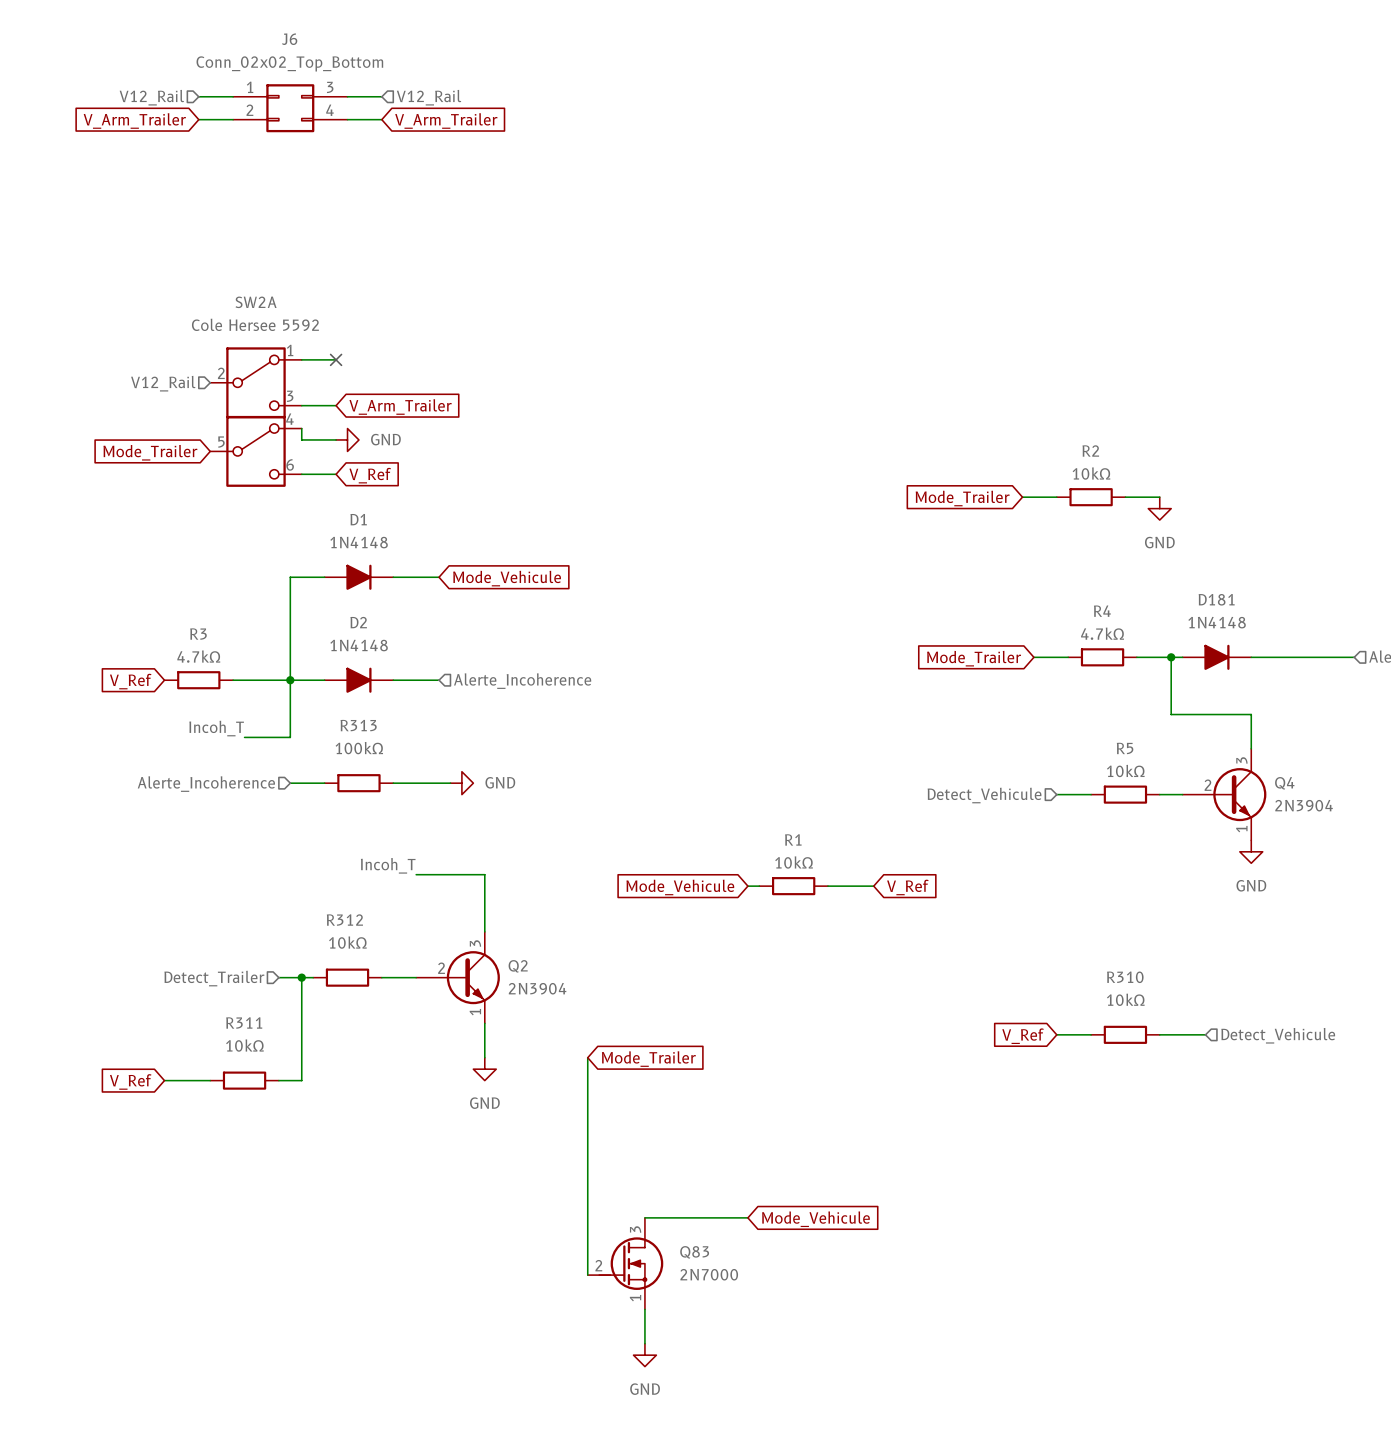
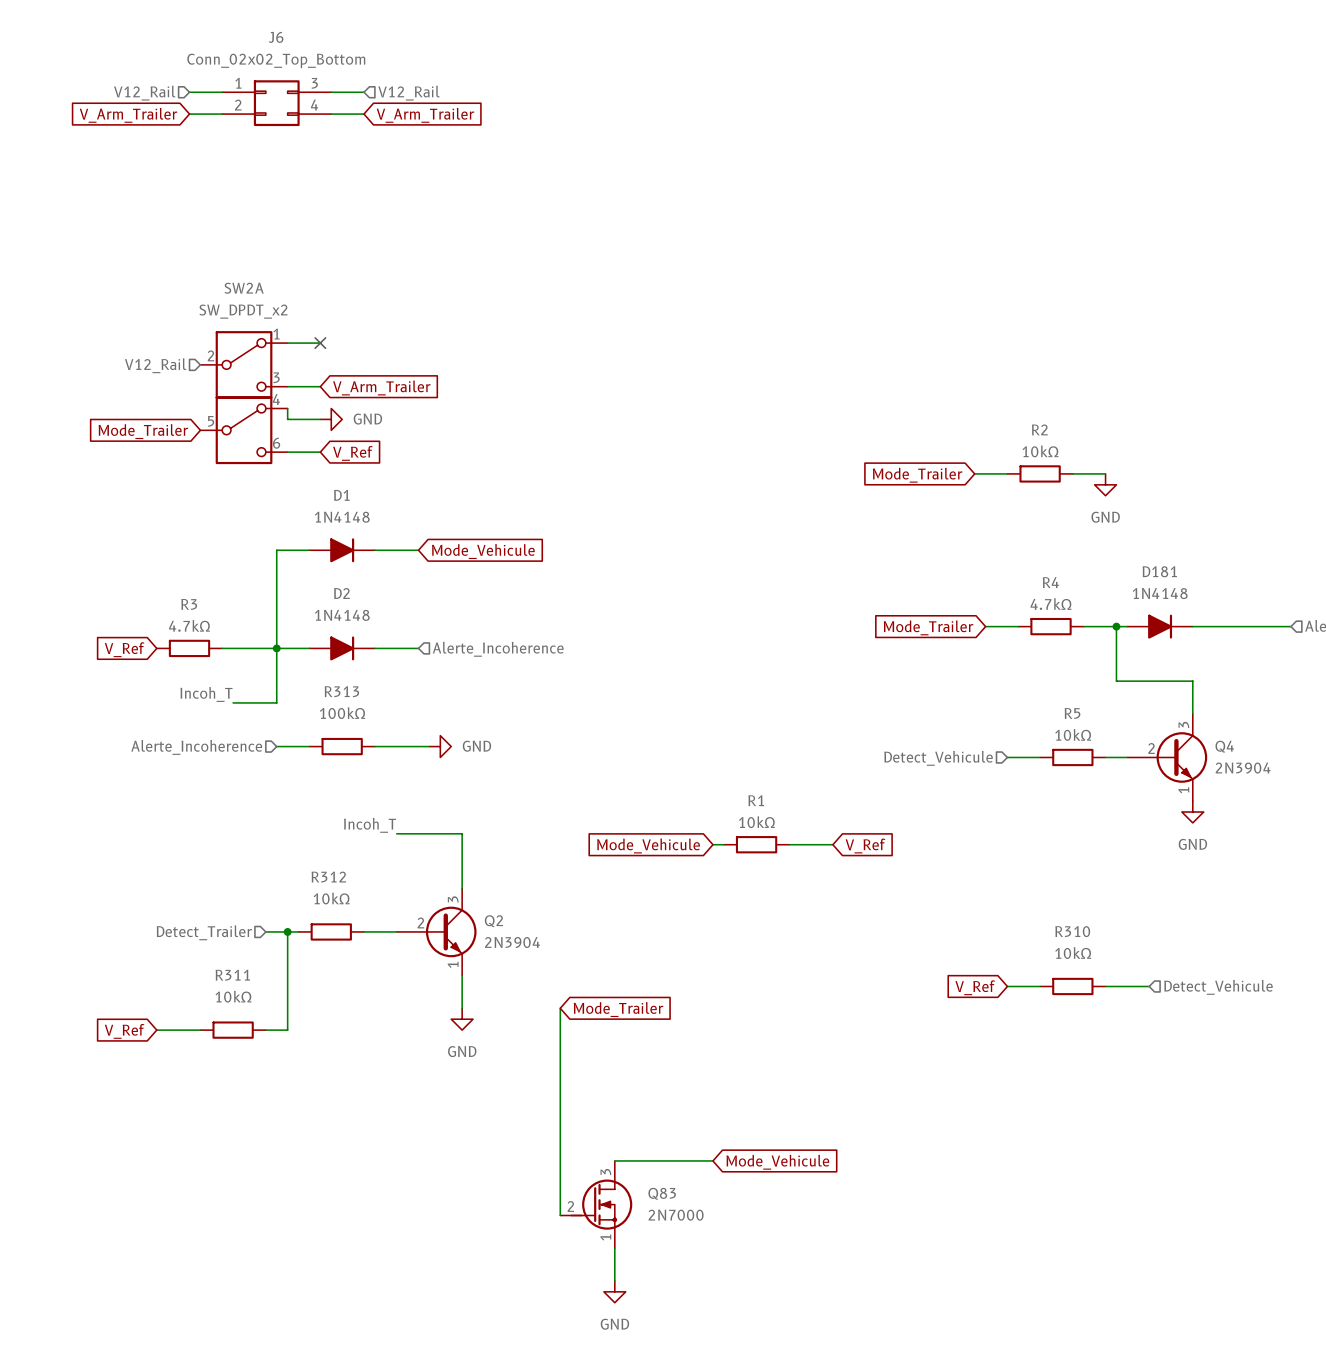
SW2A value: Cole Hersee 5592 (255, 324) -> SW_DPDT_x2 (243, 311)

